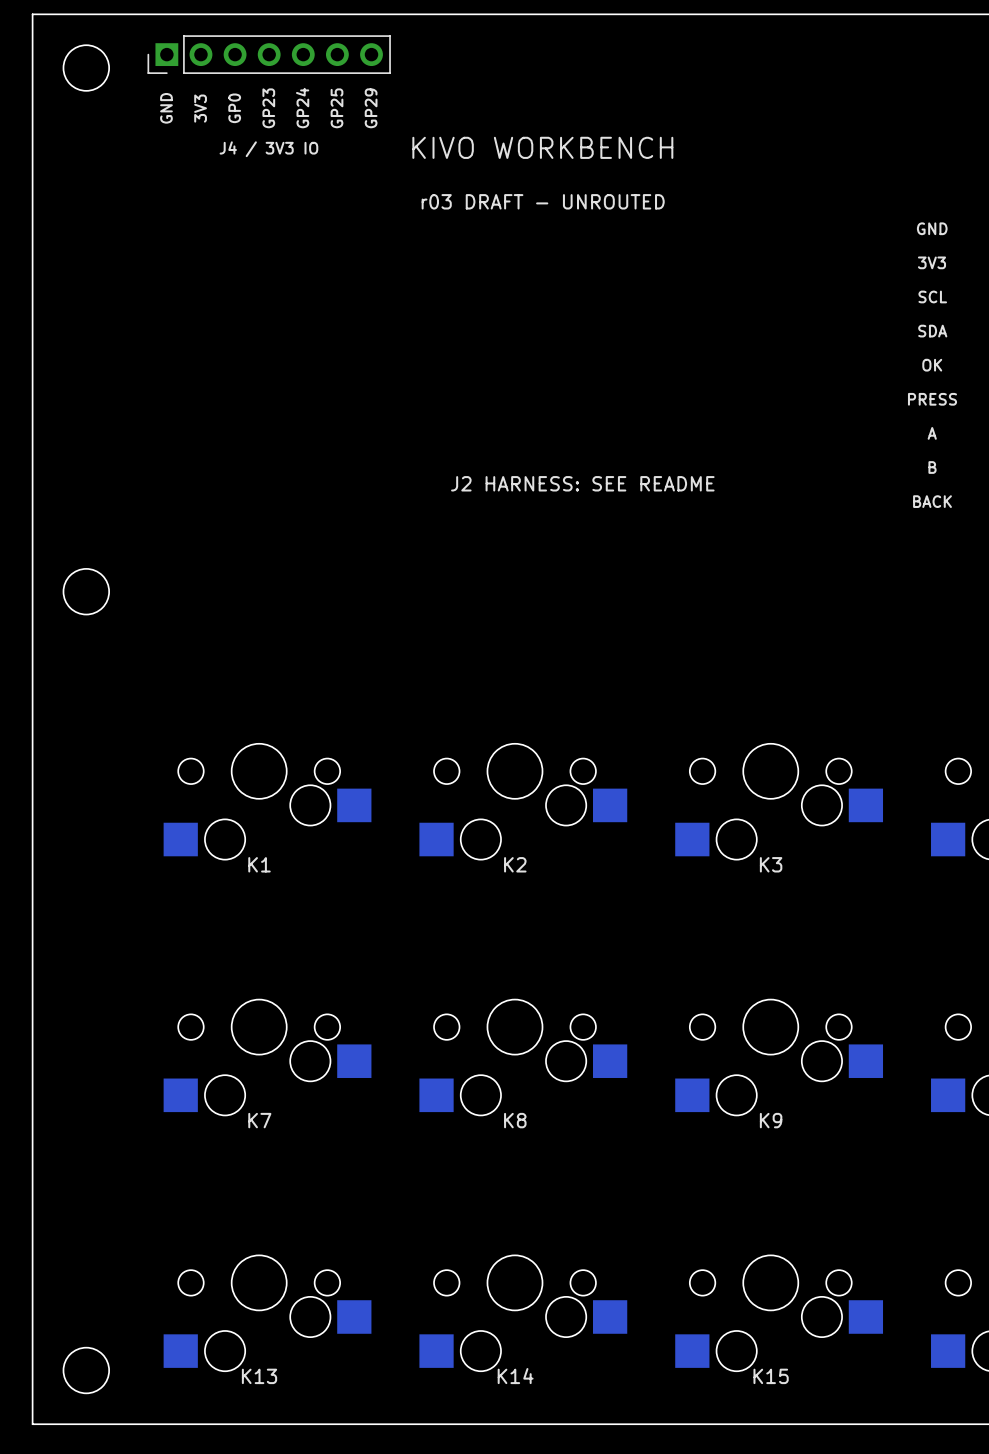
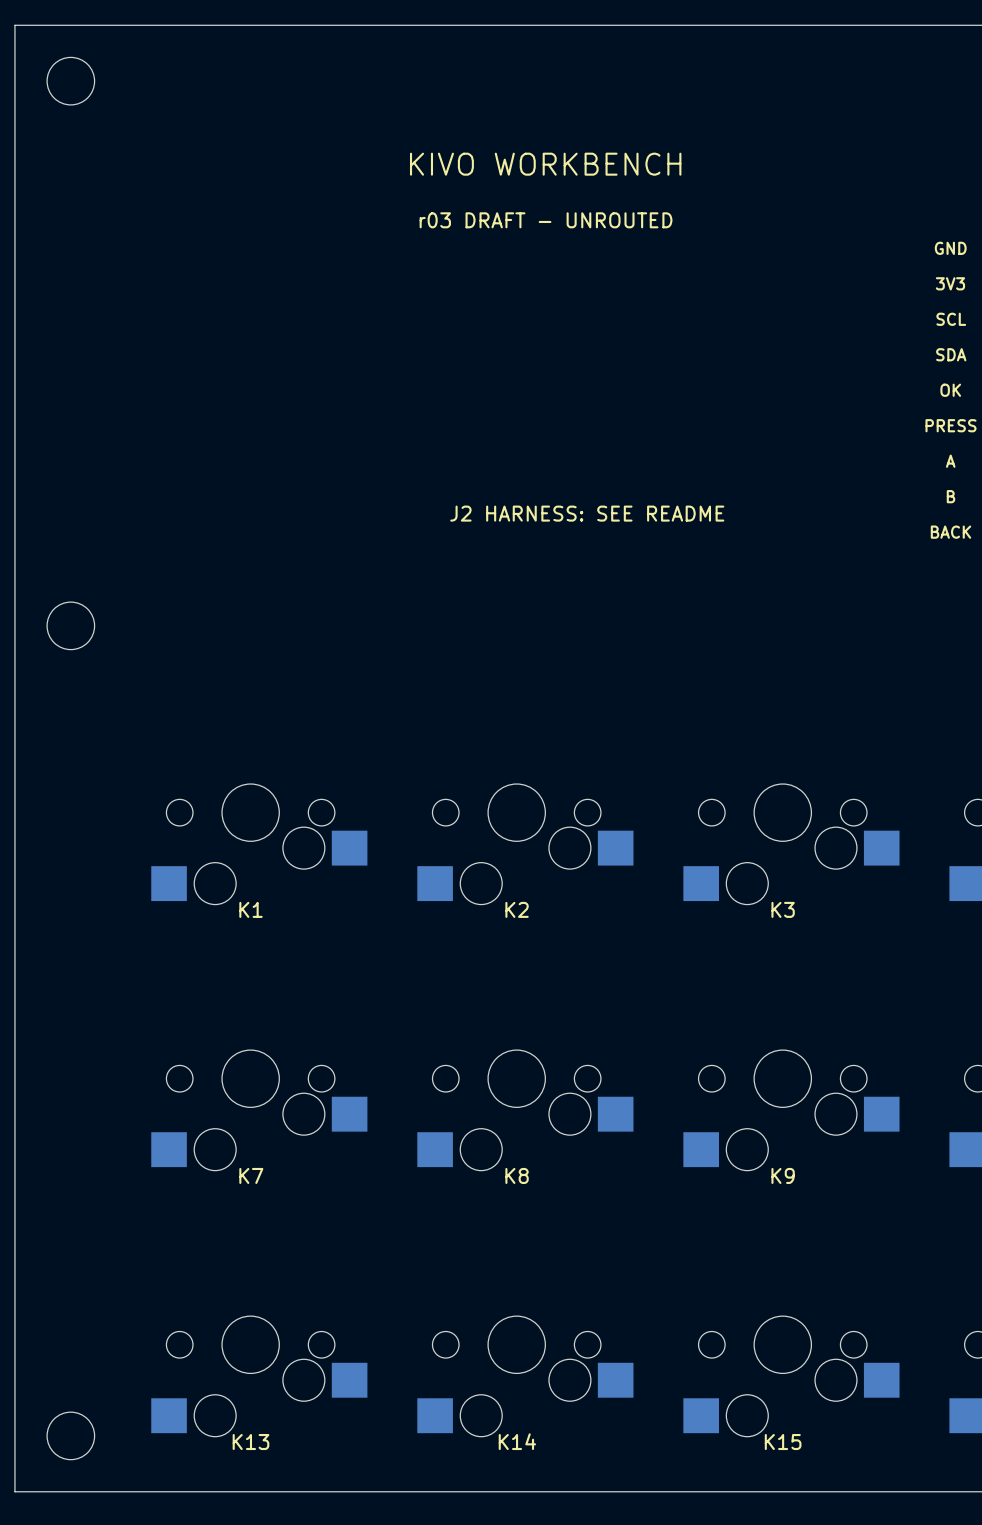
part: (269, 54) -> none
text: GND (166, 108) -> none
text: 3V3 (200, 108) -> none
text: GP0 (234, 108) -> none
text: GP23 (268, 108) -> none
text: GP24 (302, 108) -> none
text: GP25 (337, 108) -> none
text: GP29 (371, 108) -> none
text: J4 / 3V3 IO (268, 149) -> none

